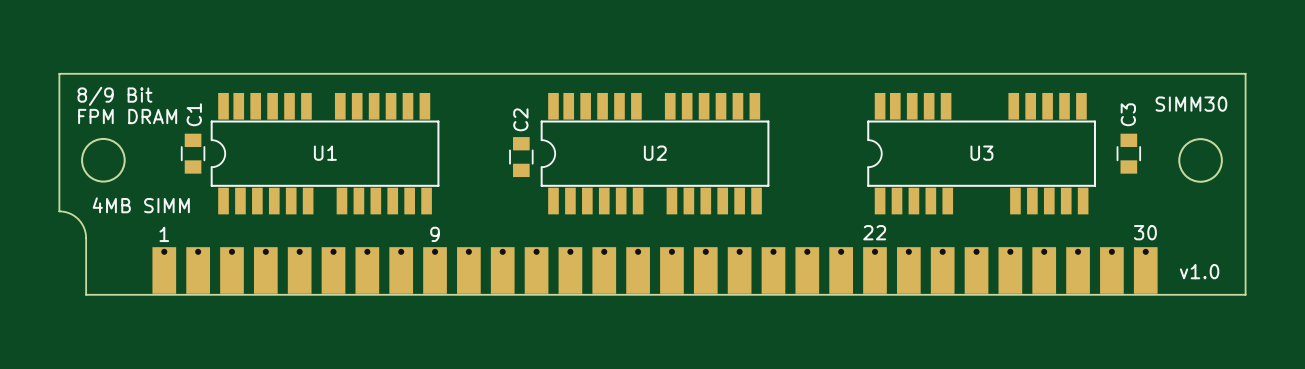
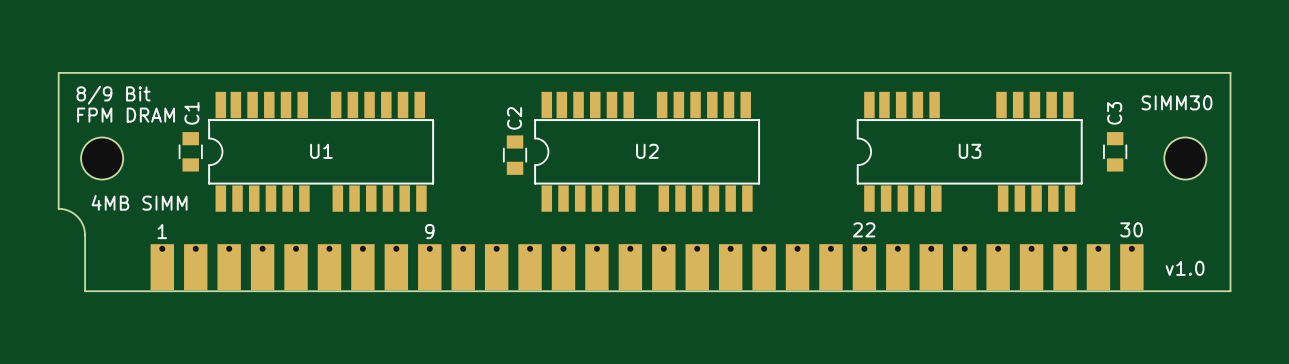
round board edge: [81, 137, 126, 183] -> none
round board edge: [1178, 138, 1223, 183] -> none
part: none -> (102, 158)
part: none -> (1185, 158)

